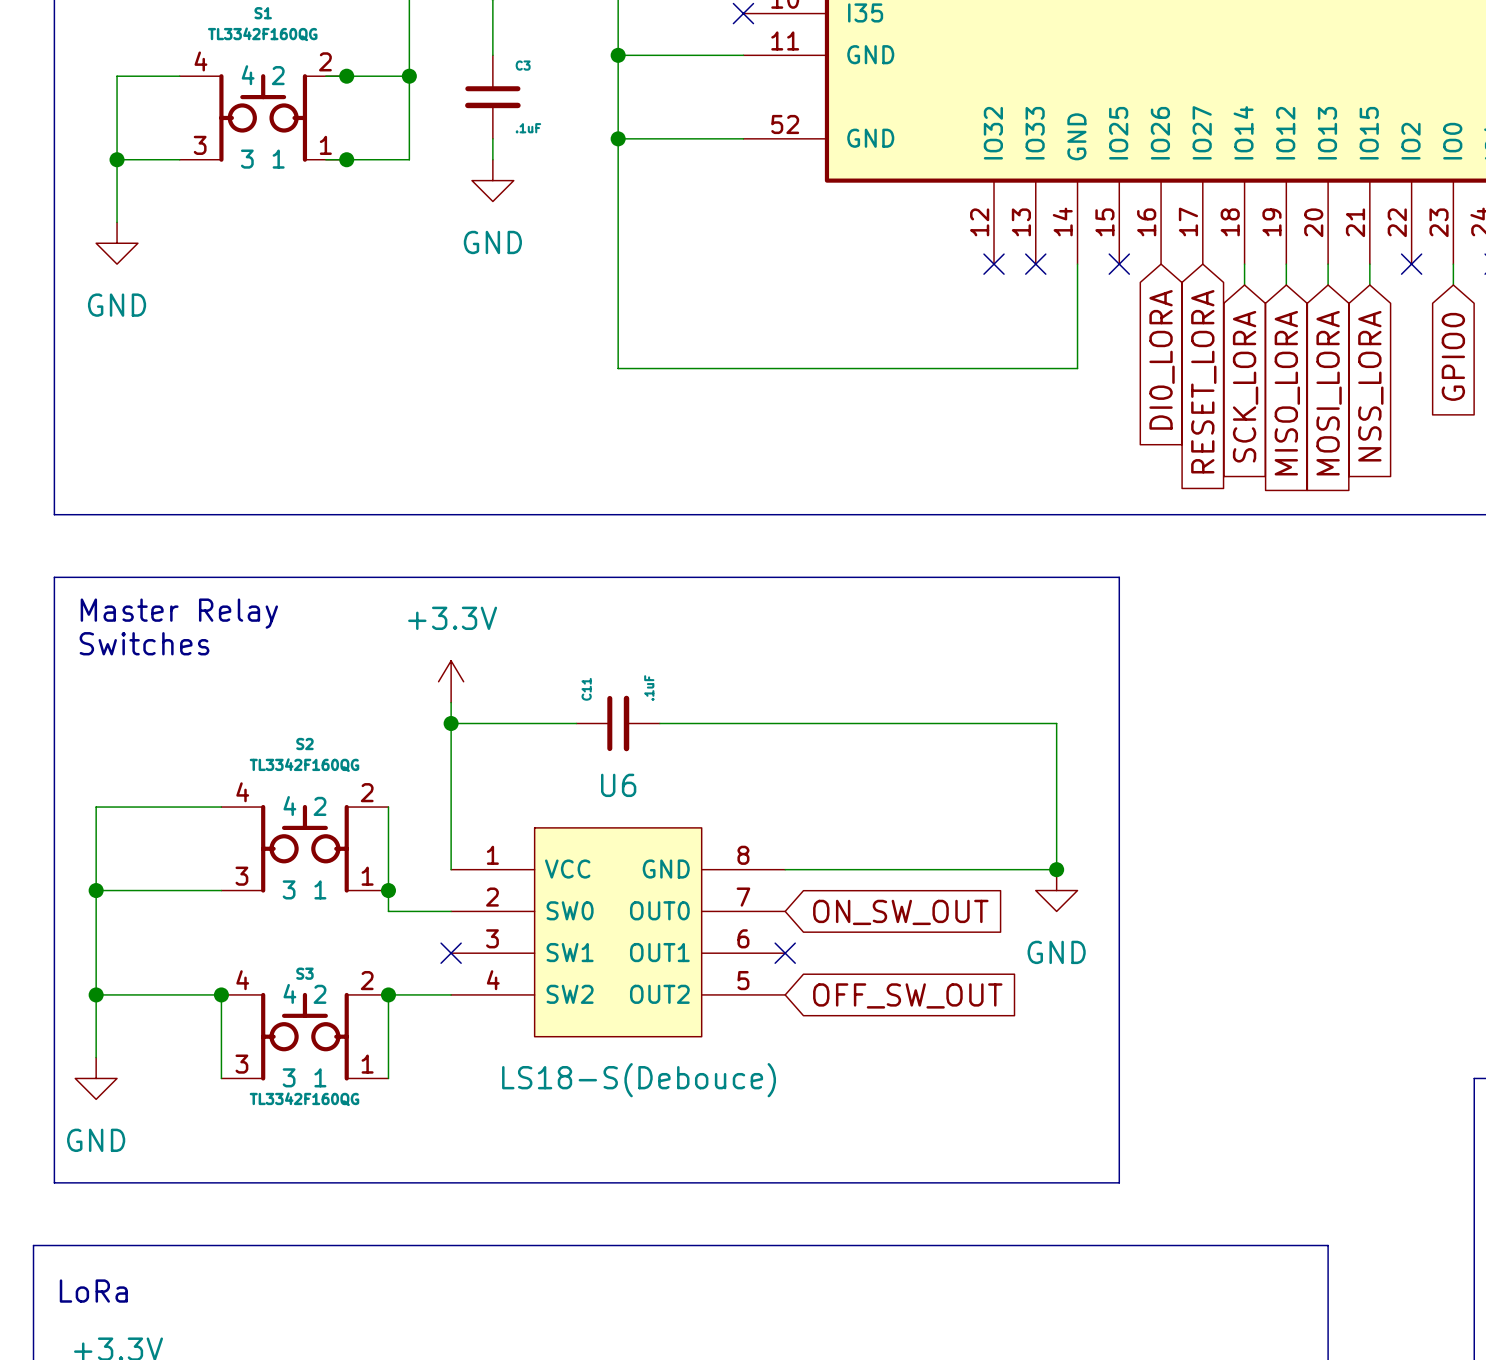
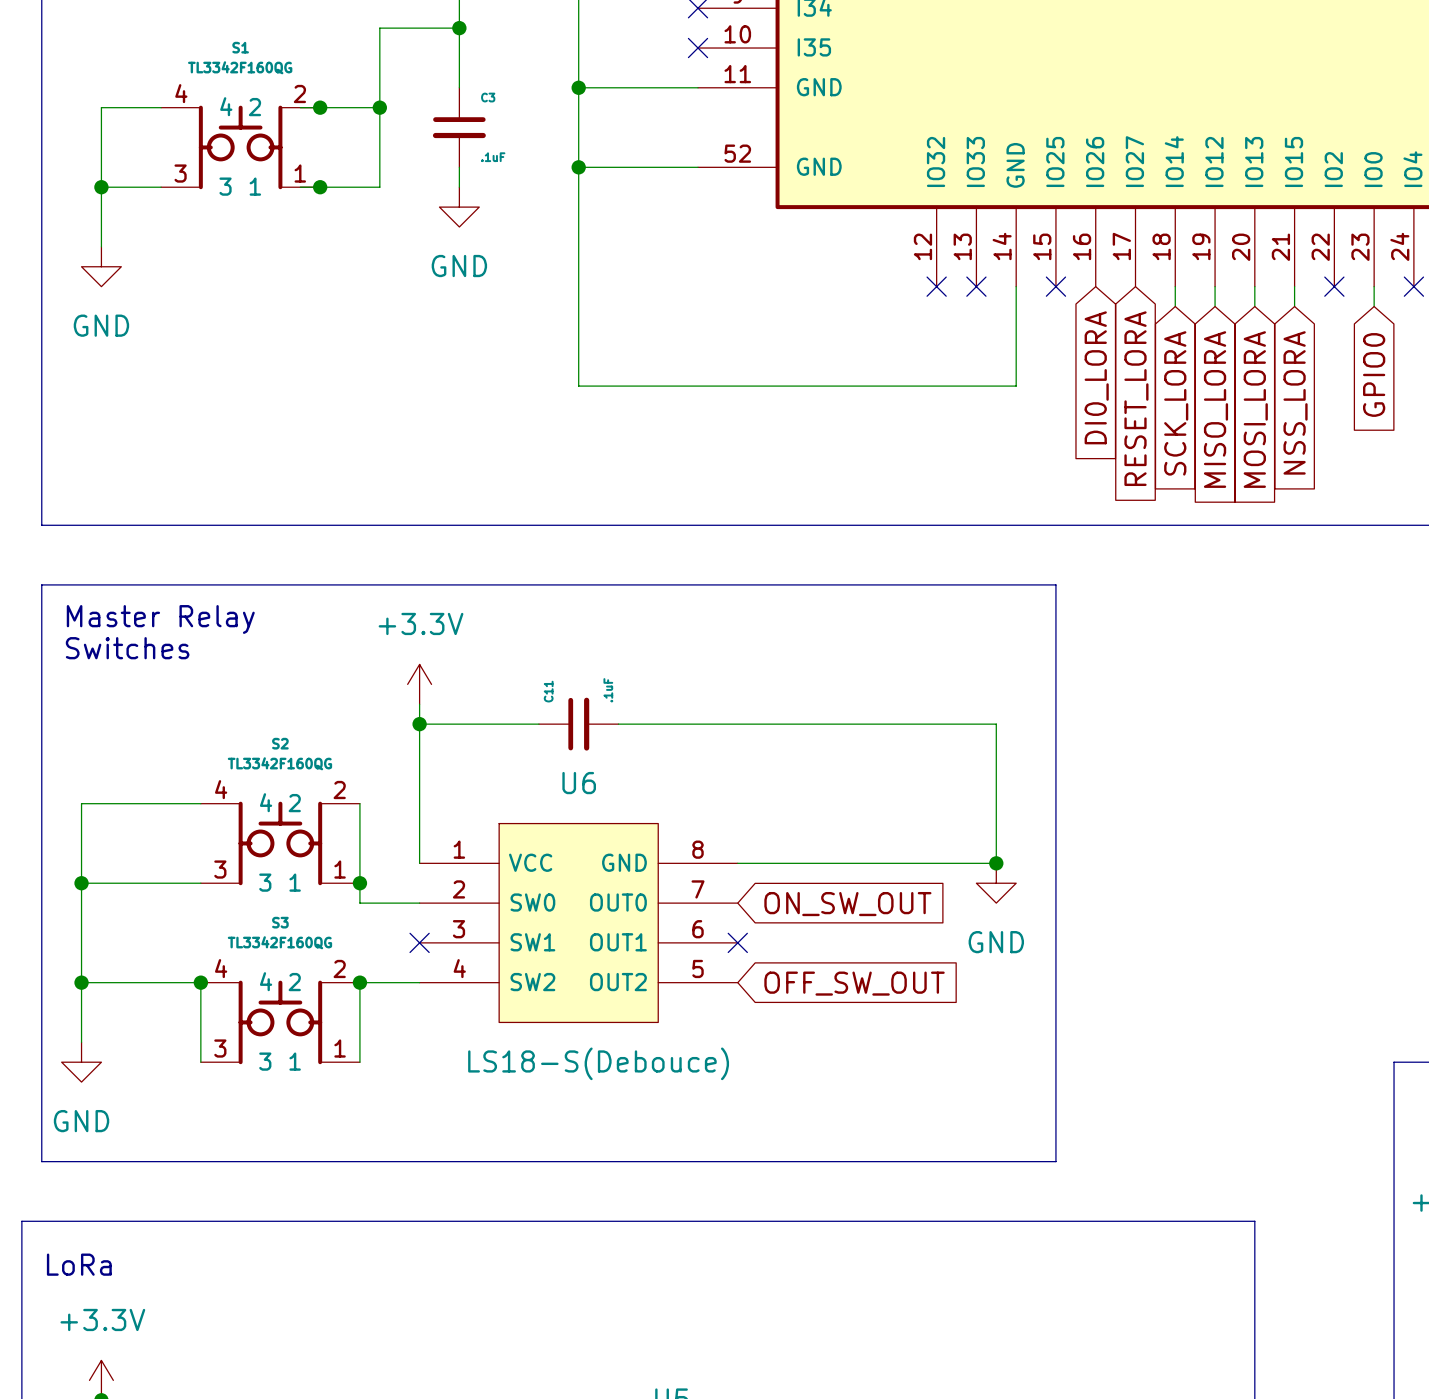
S3 name position: S3 (304, 973) -> S3 (280, 922)
S3 value position: TL3342F160QG (304, 1099) -> TL3342F160QG (279, 942)

